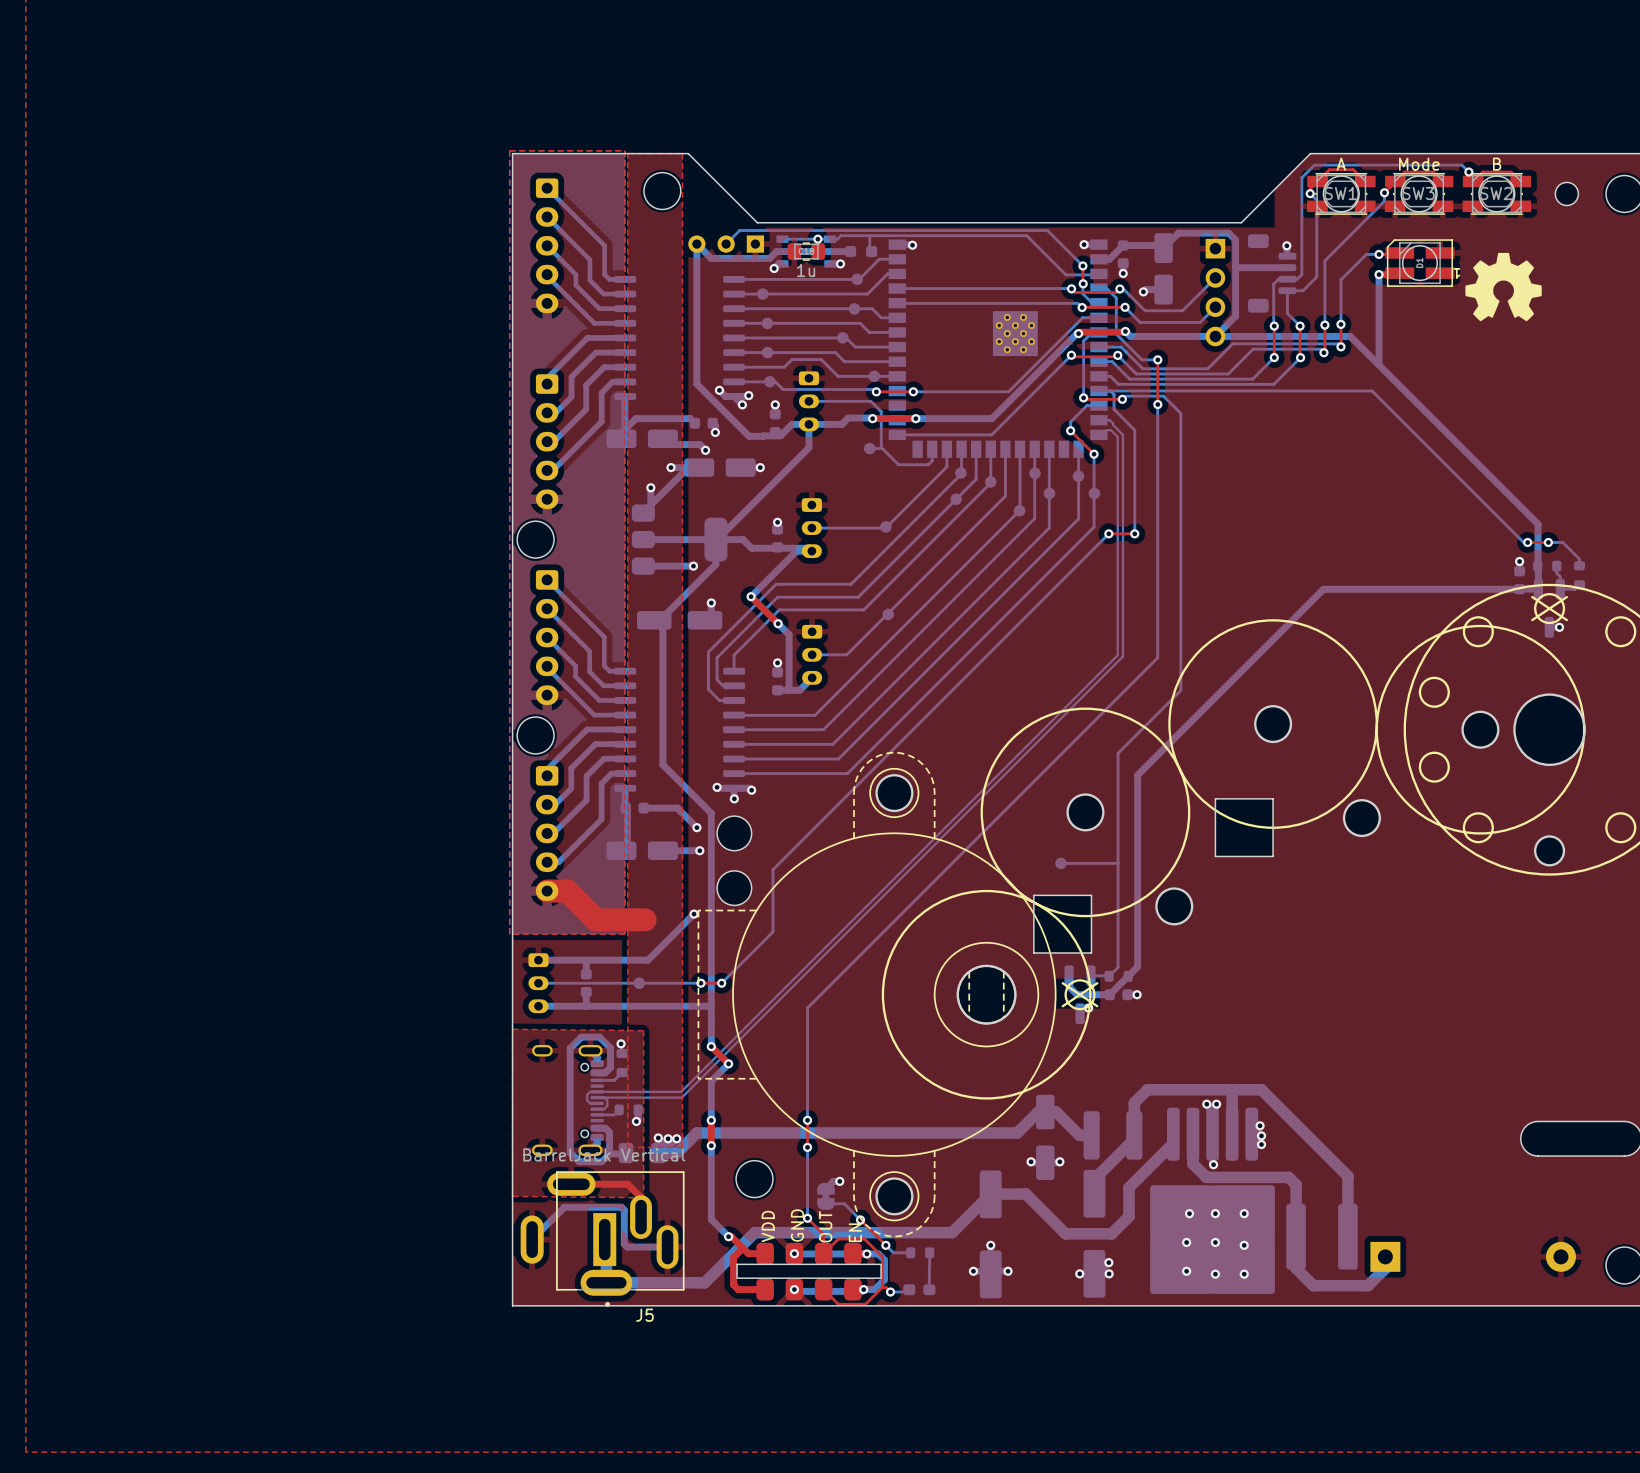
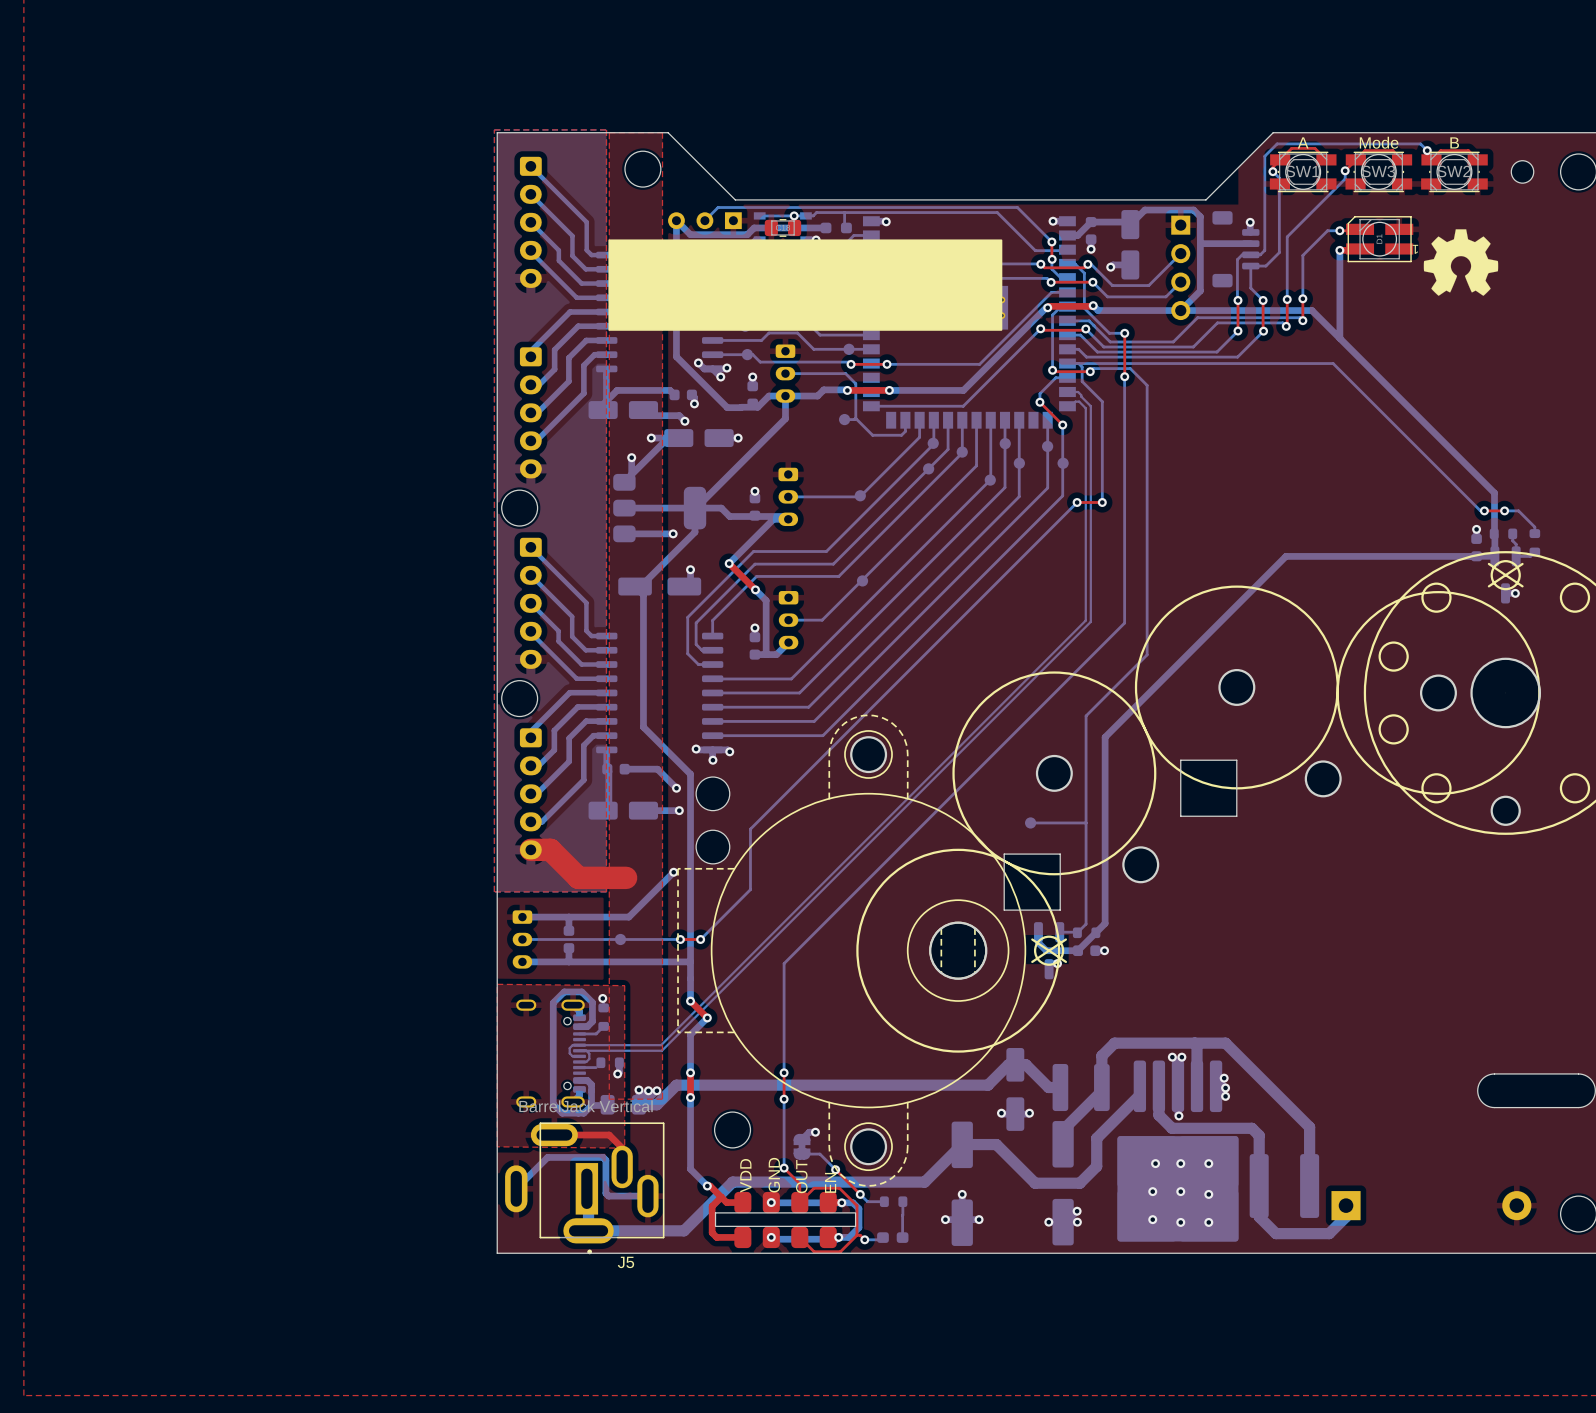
drawing: none -> [608, 239, 1003, 331]

